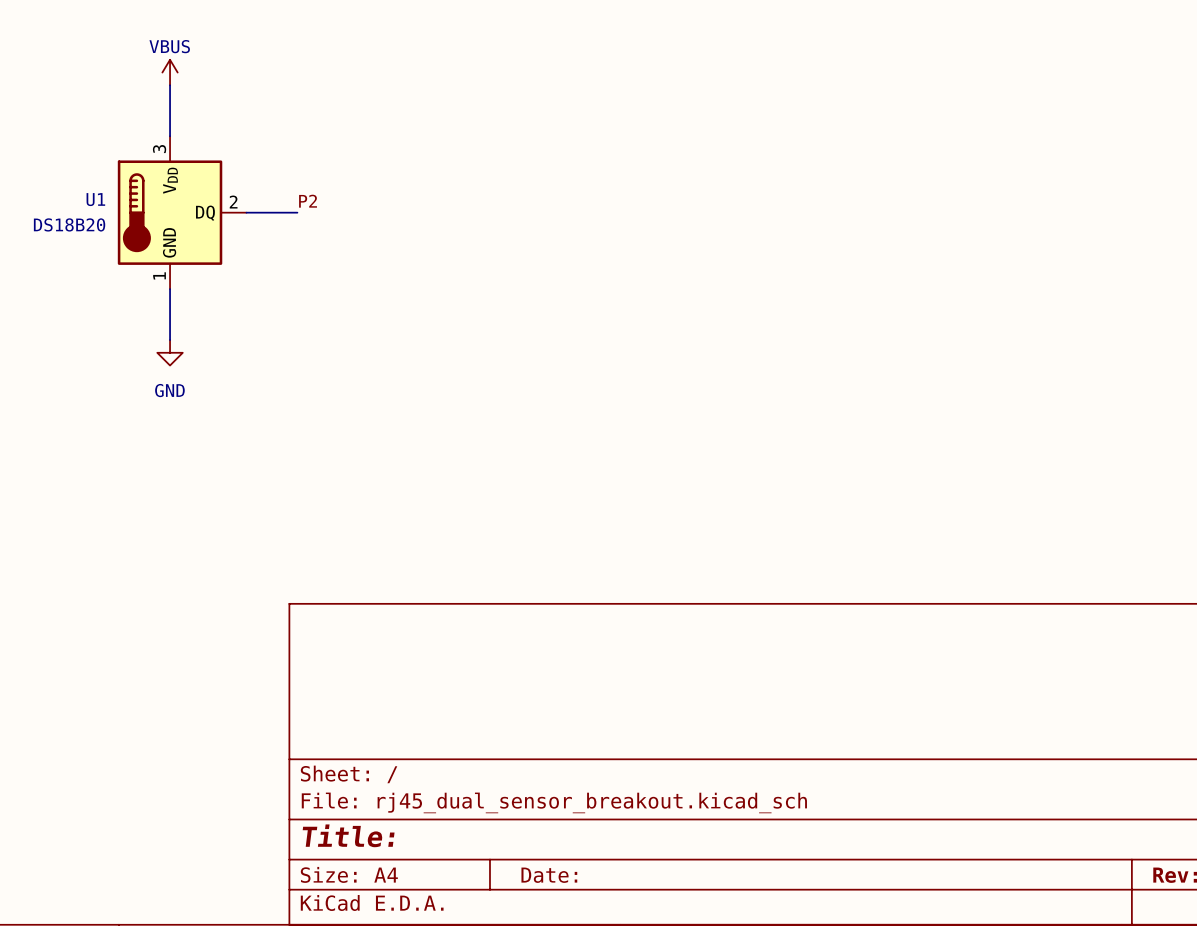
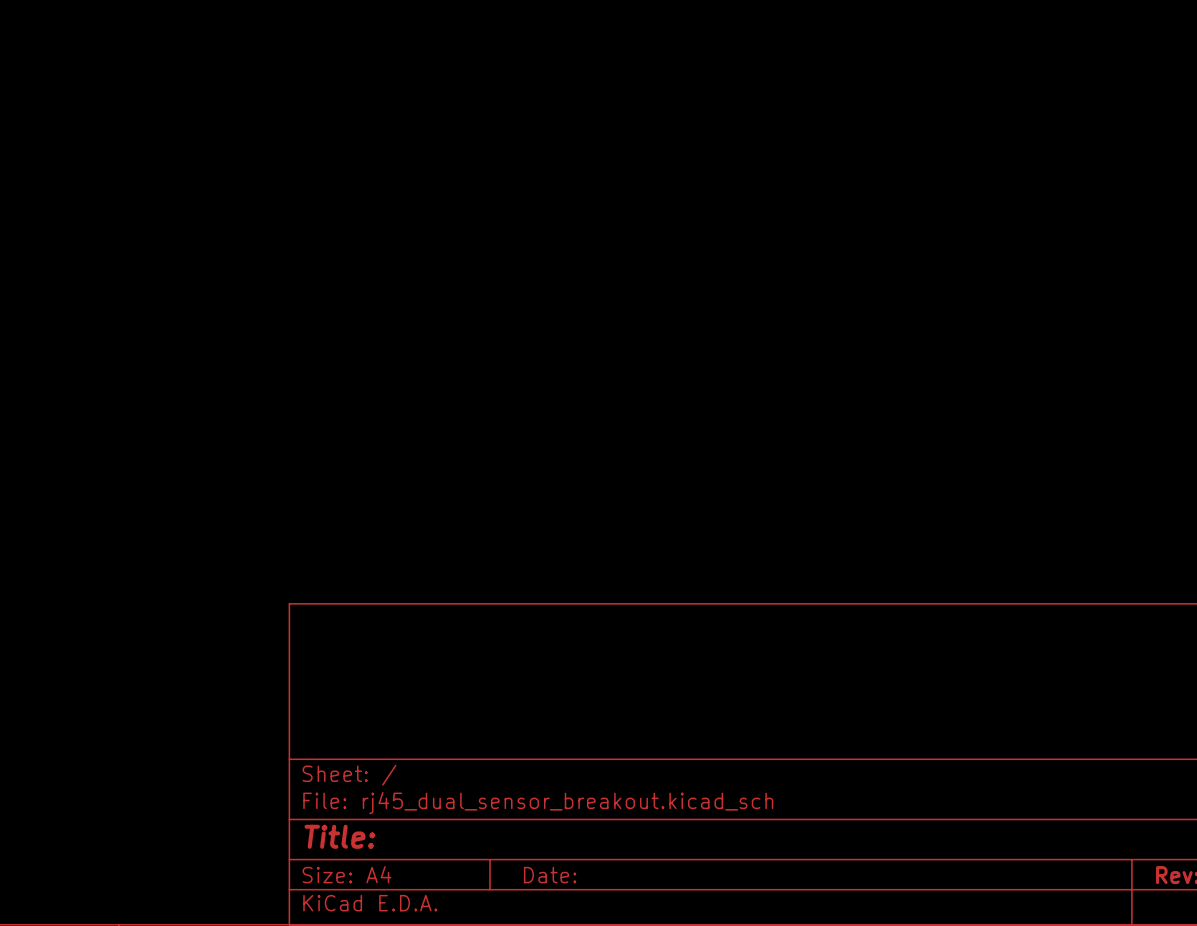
power symbol: VBUS (170, 72) -> none
wire: (170, 85) (170, 136) -> none
label: P2 (308, 201) -> none
U1: DS18B20 (182, 212) -> none
wire: (246, 212) (297, 212) -> none
wire: (170, 289) (170, 340) -> none
power symbol: GND (170, 352) -> none

